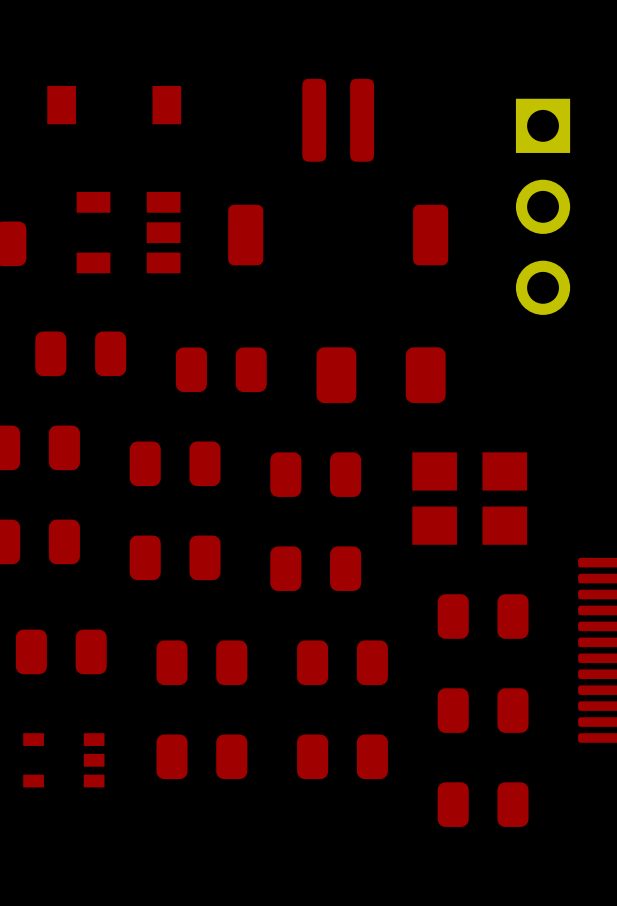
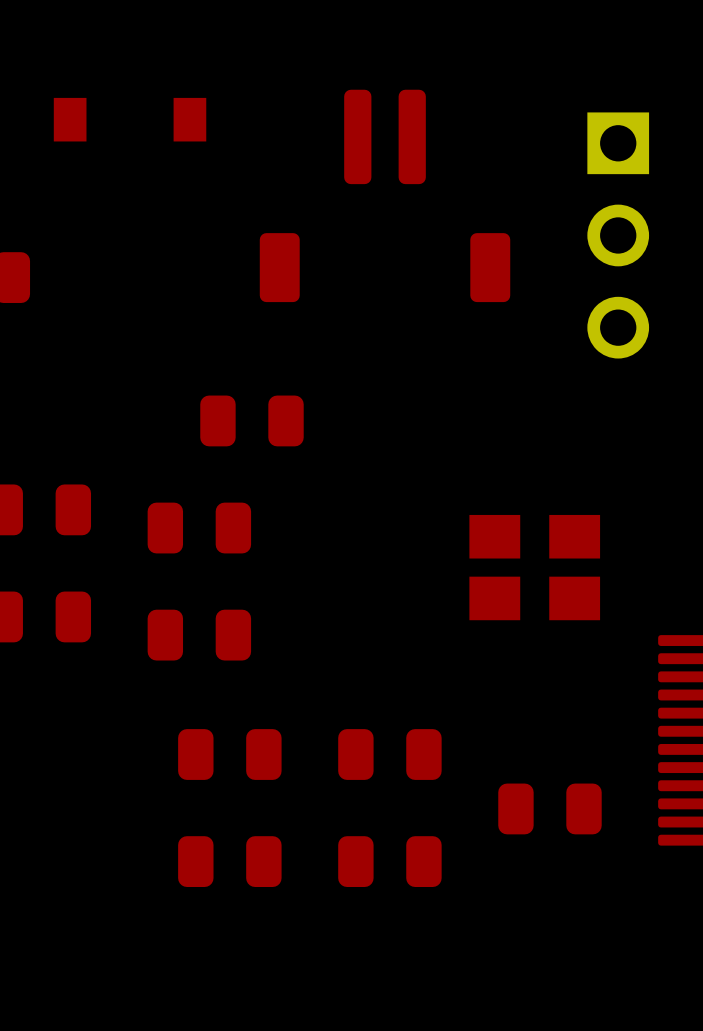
part: (128, 232) -> none
part: (80, 353) -> none
part: (381, 375) -> none
part: (315, 474) -> none
part: (315, 568) -> none
part: (483, 616) -> none
part: (61, 651) -> none
part: (63, 760) -> none
part: (483, 804) -> none

